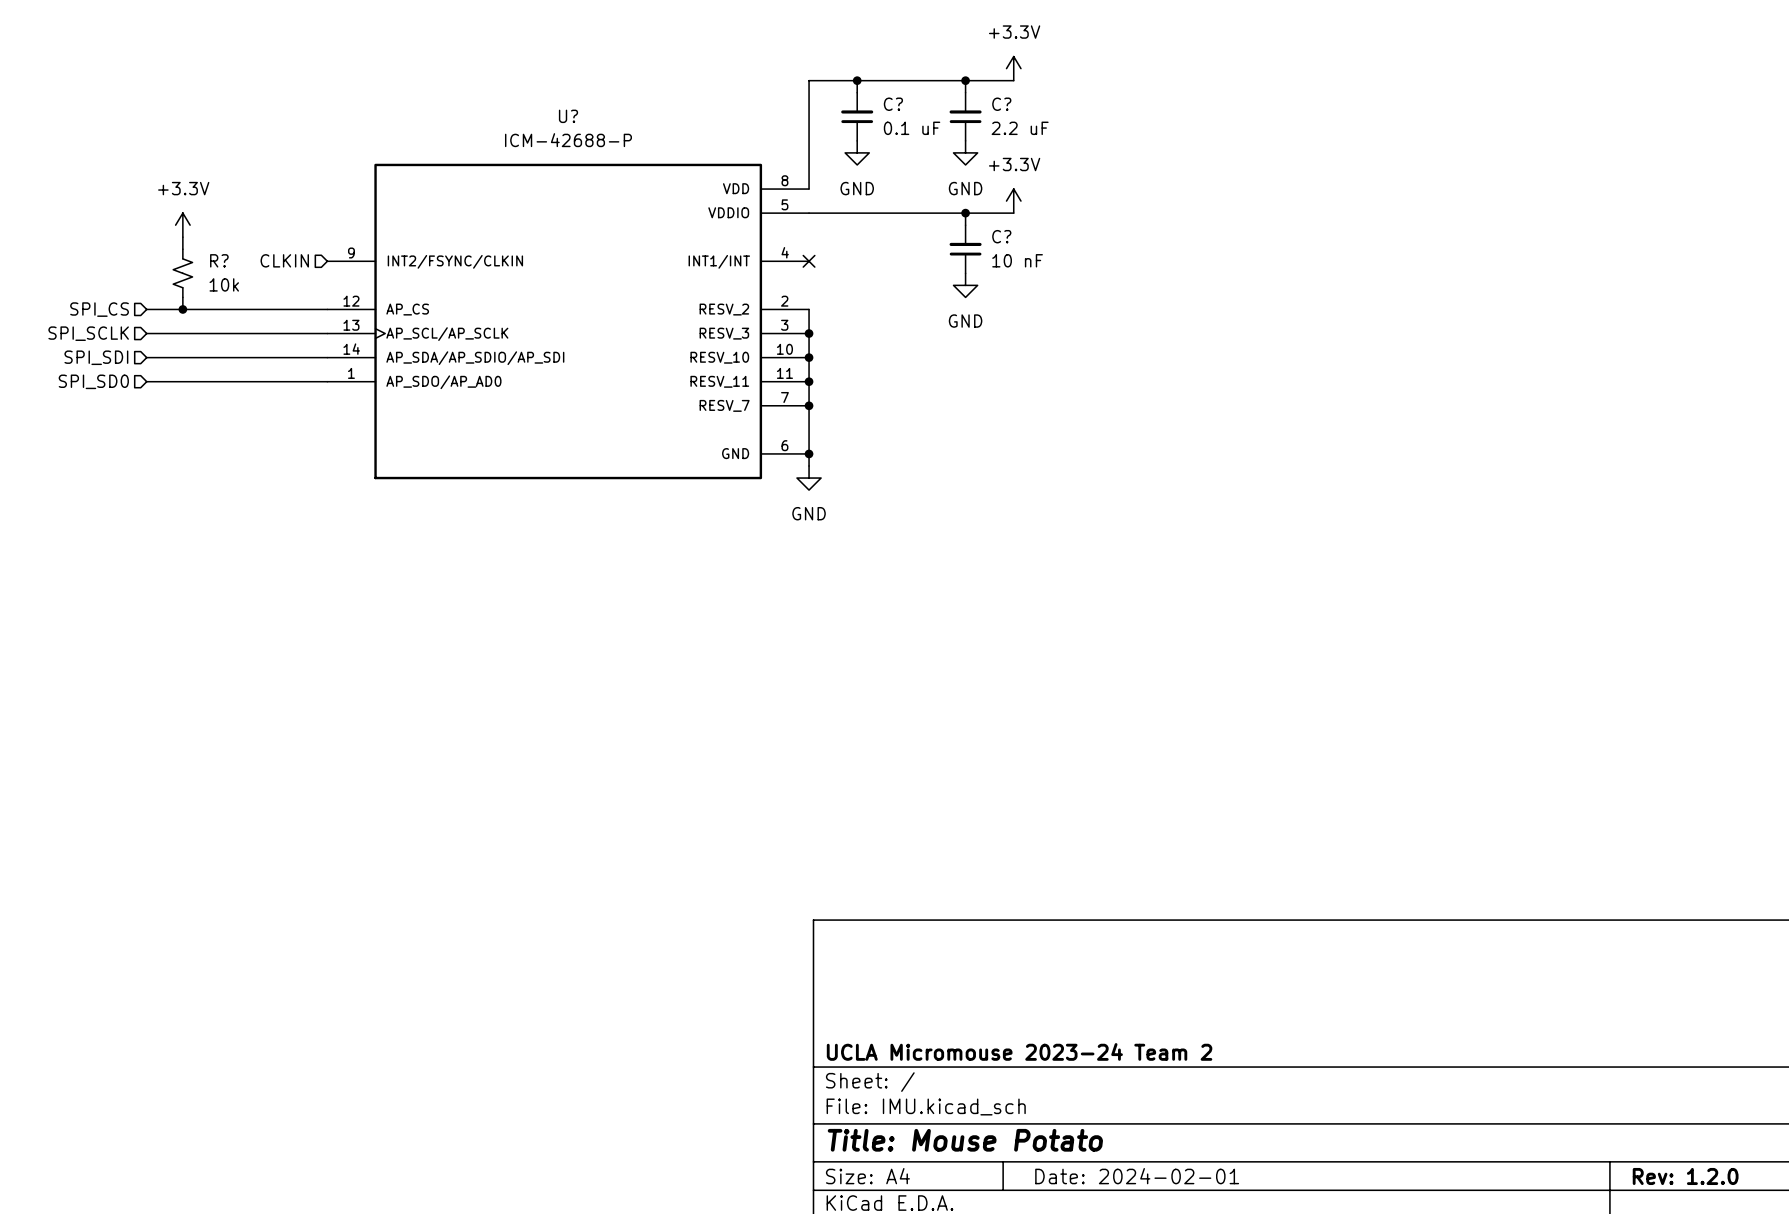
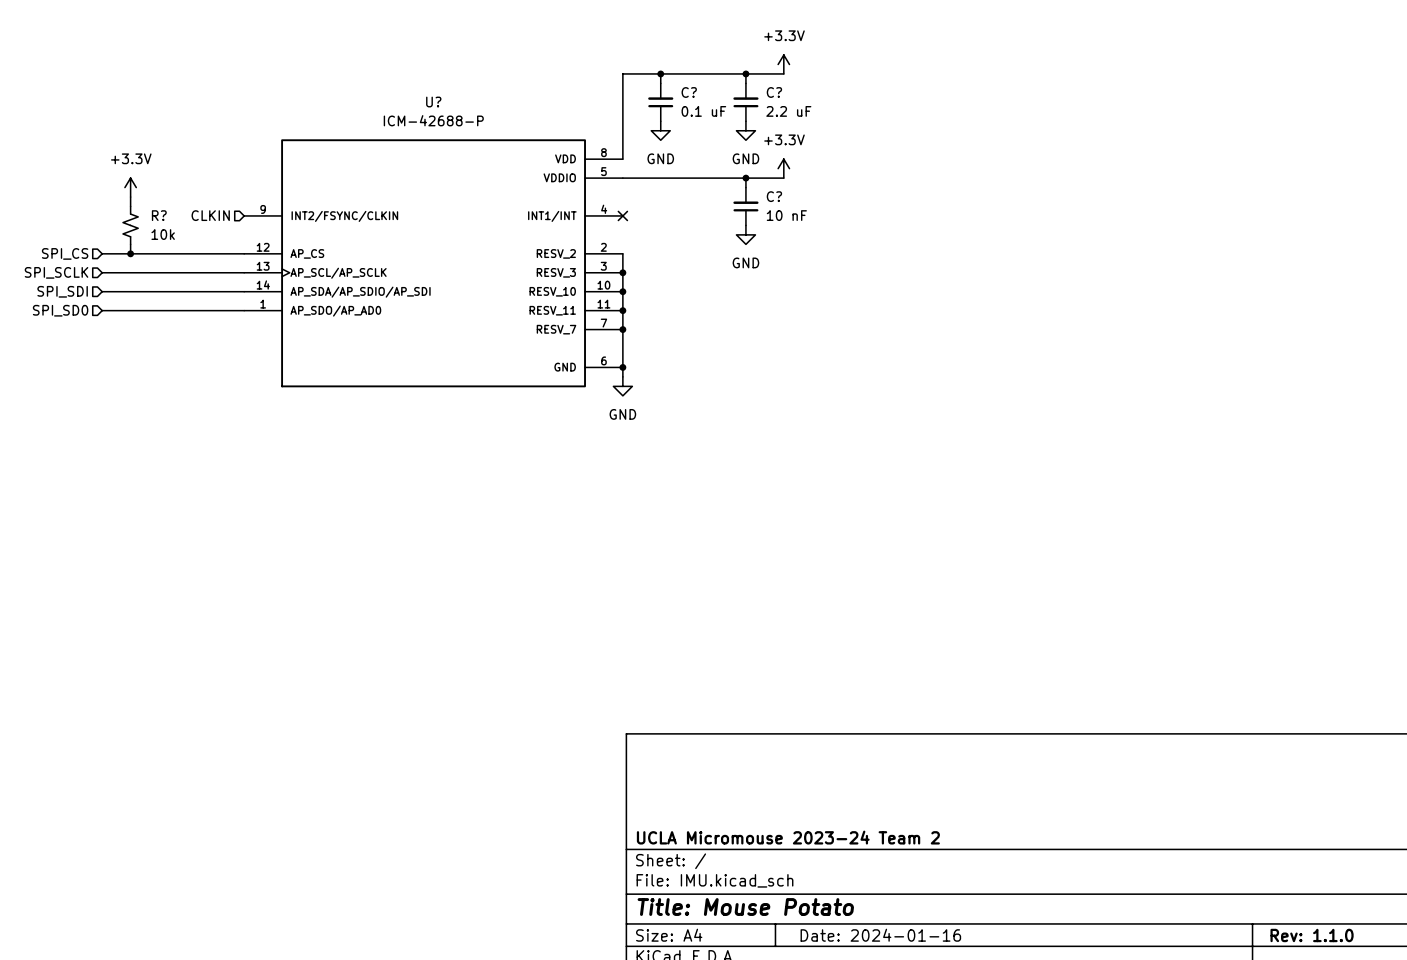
title block: Date: 2024-02-01 (1137, 1176) -> Date: 2024-01-16 (880, 935)
title block: Rev: 1.2.0 (1685, 1176) -> Rev: 1.1.0 (1312, 935)

